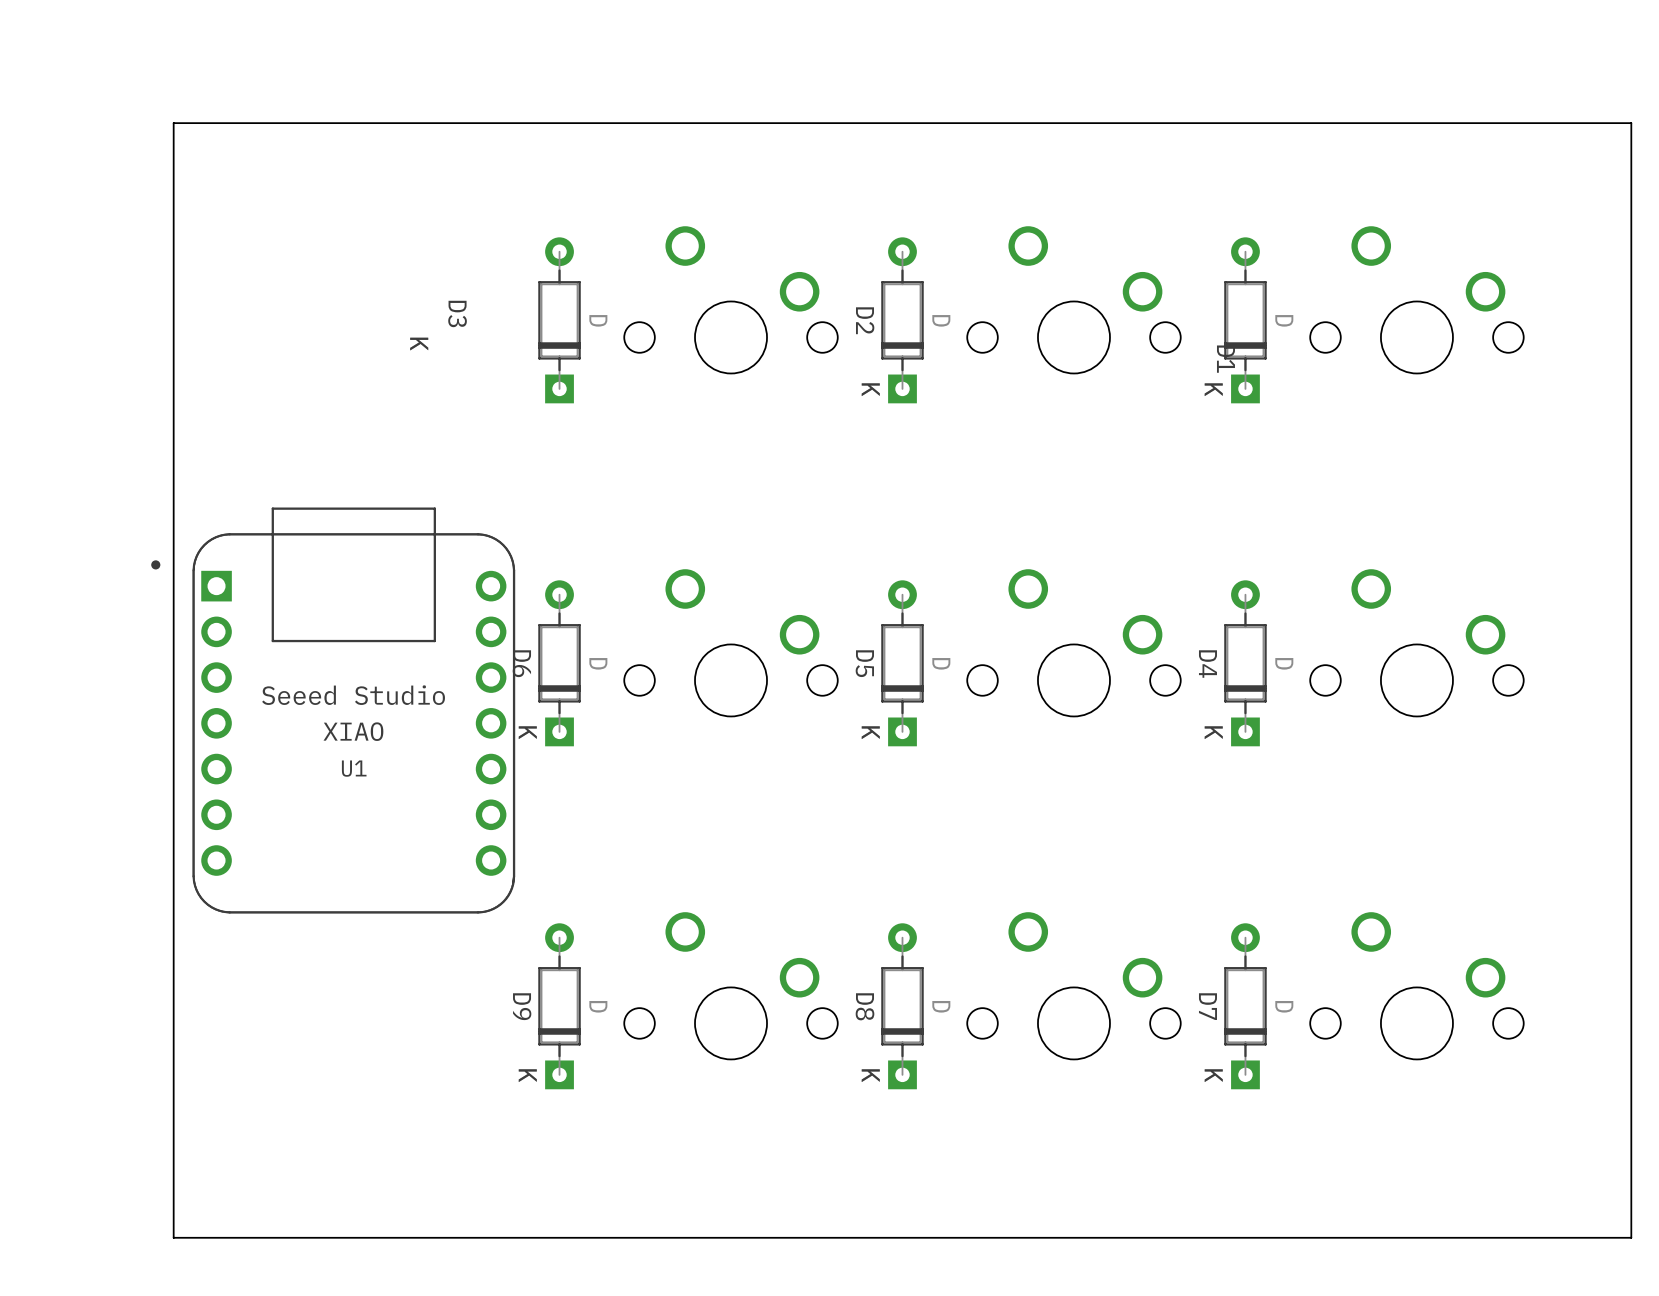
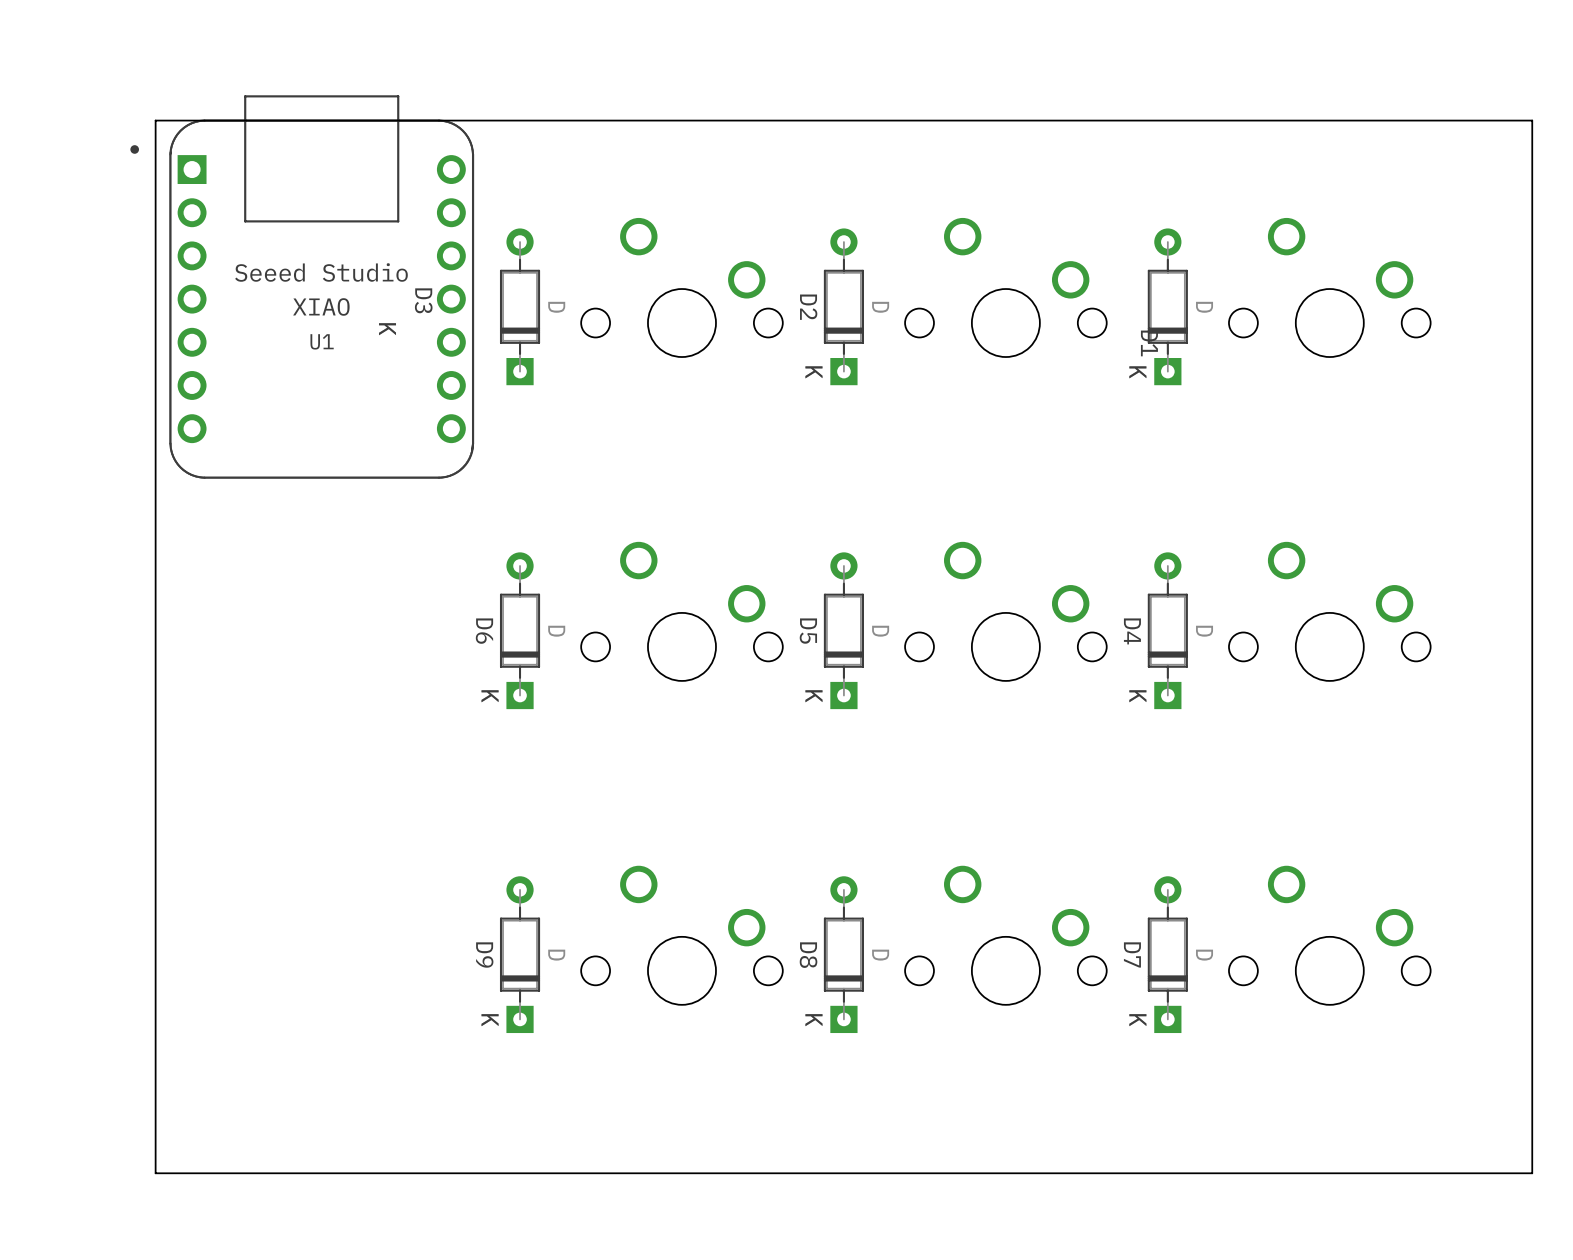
U1 footprint: [151, 507, 516, 914] -> [130, 95, 475, 479]

